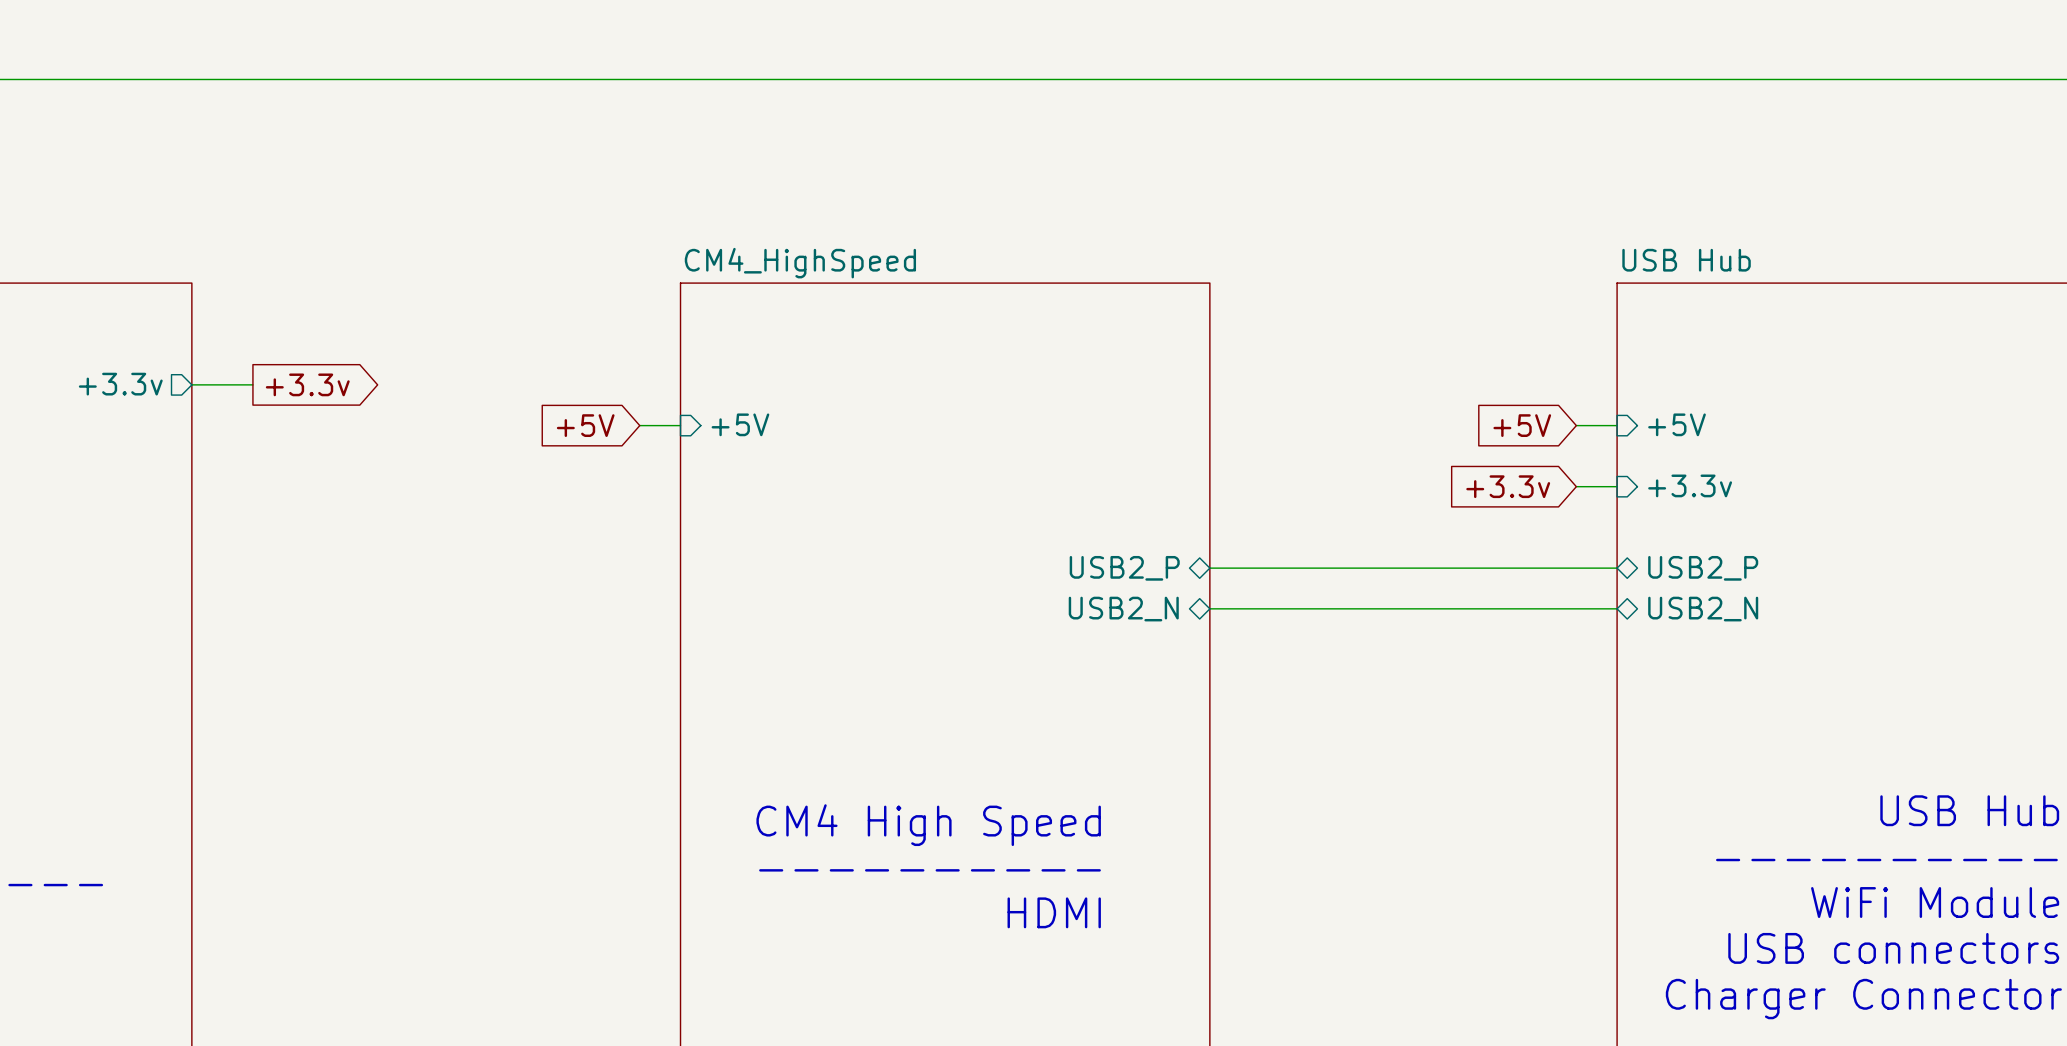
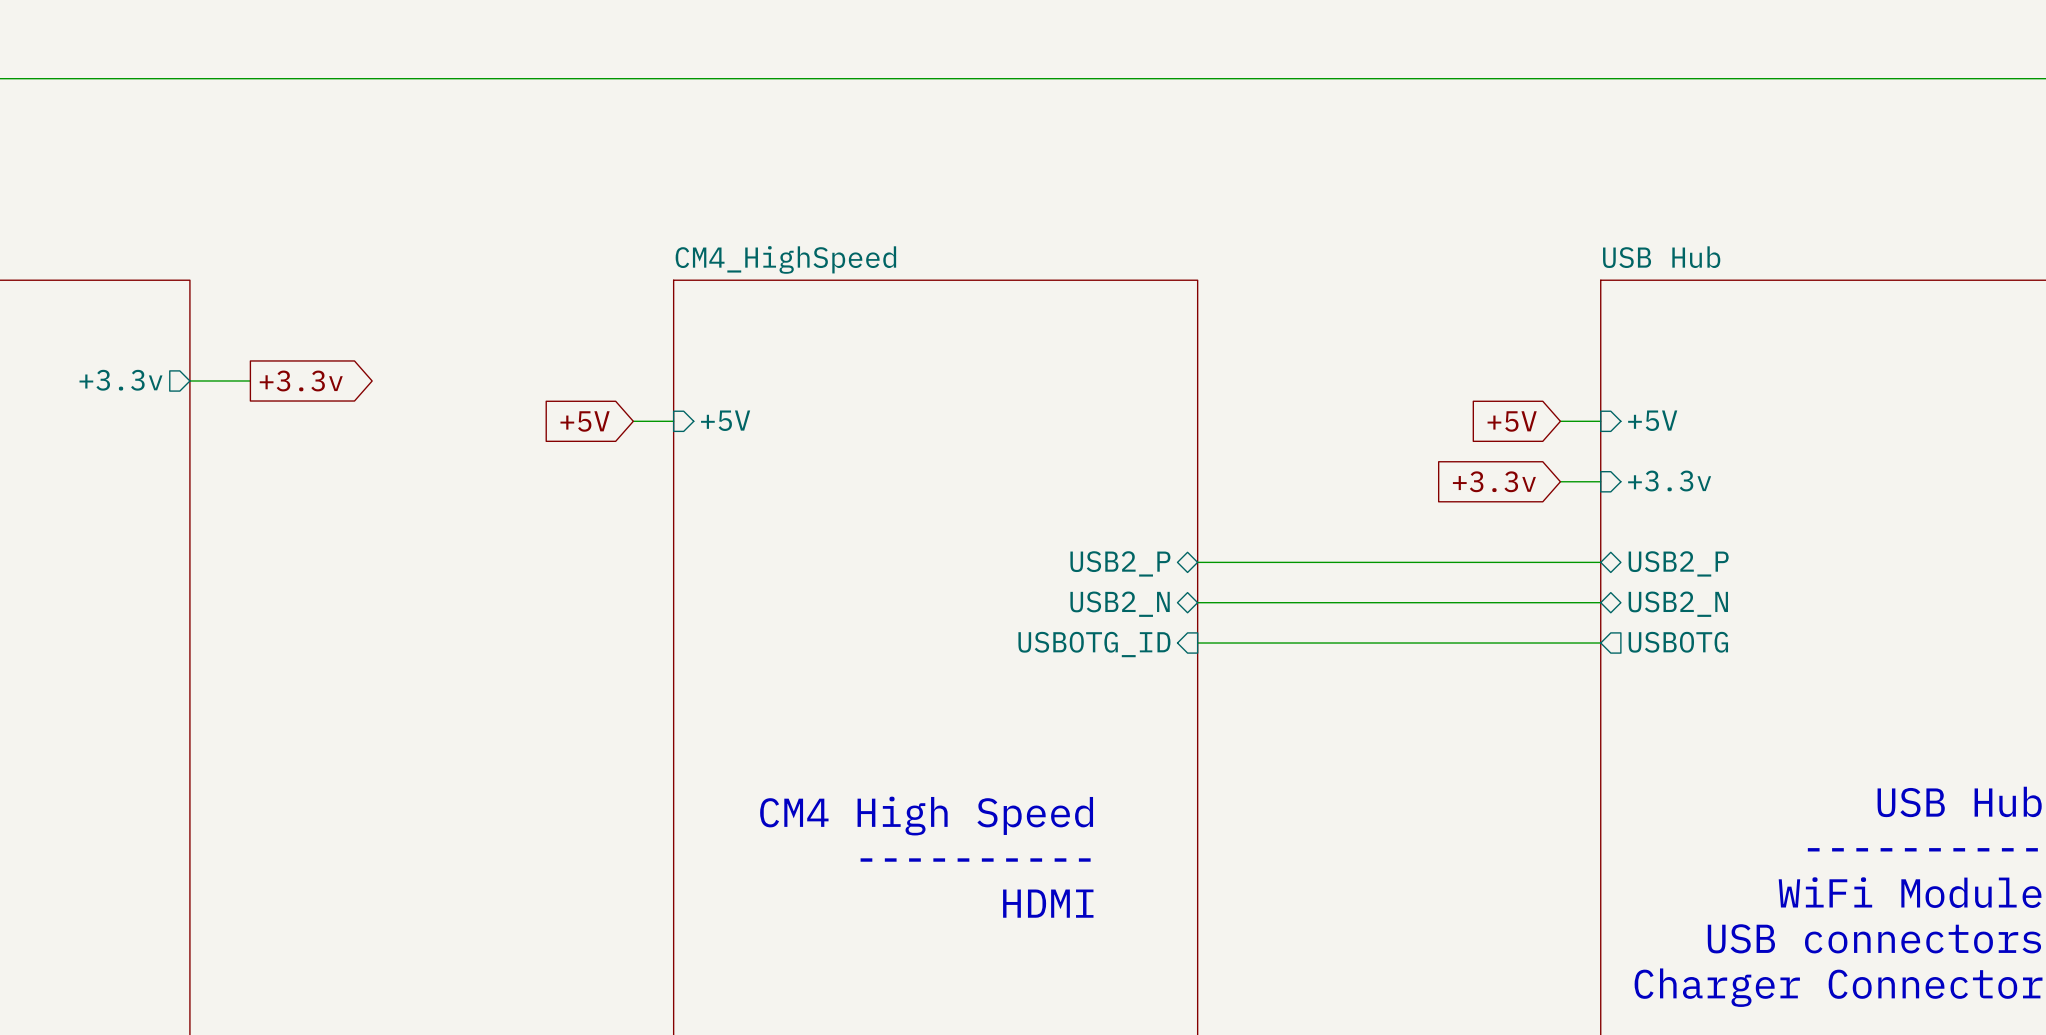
sheet pin: none -> USBOTG (1678, 642)
sheet pin: none -> USBOTG_ID (1094, 644)
wire: none -> (1197, 643) (1600, 643)

